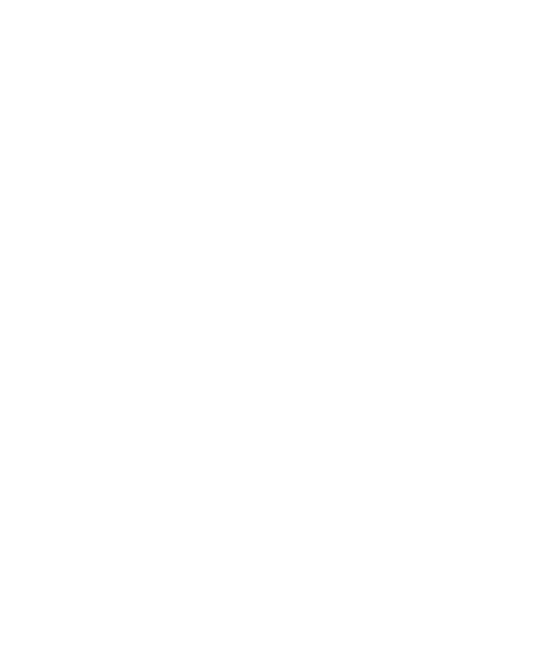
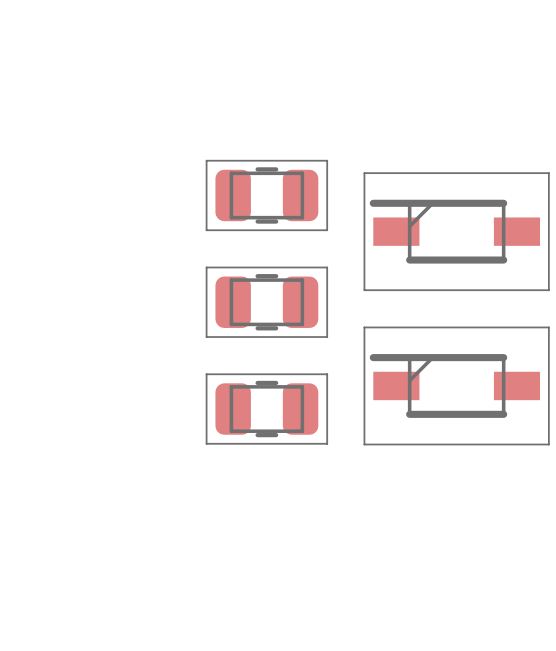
part: none -> (266, 195)
part: none -> (456, 231)
part: none -> (266, 302)
part: none -> (456, 385)
part: none -> (266, 409)

